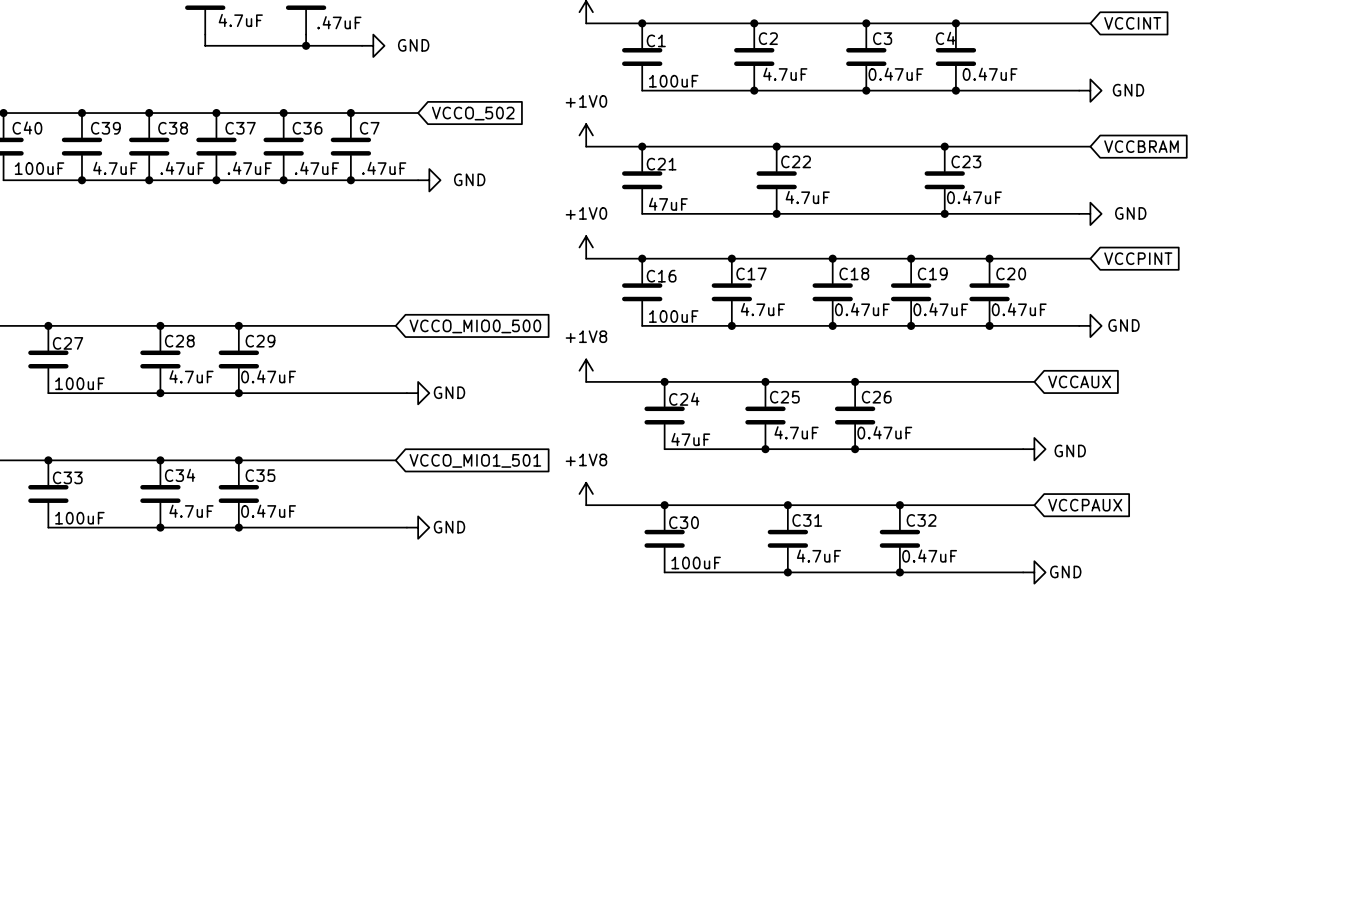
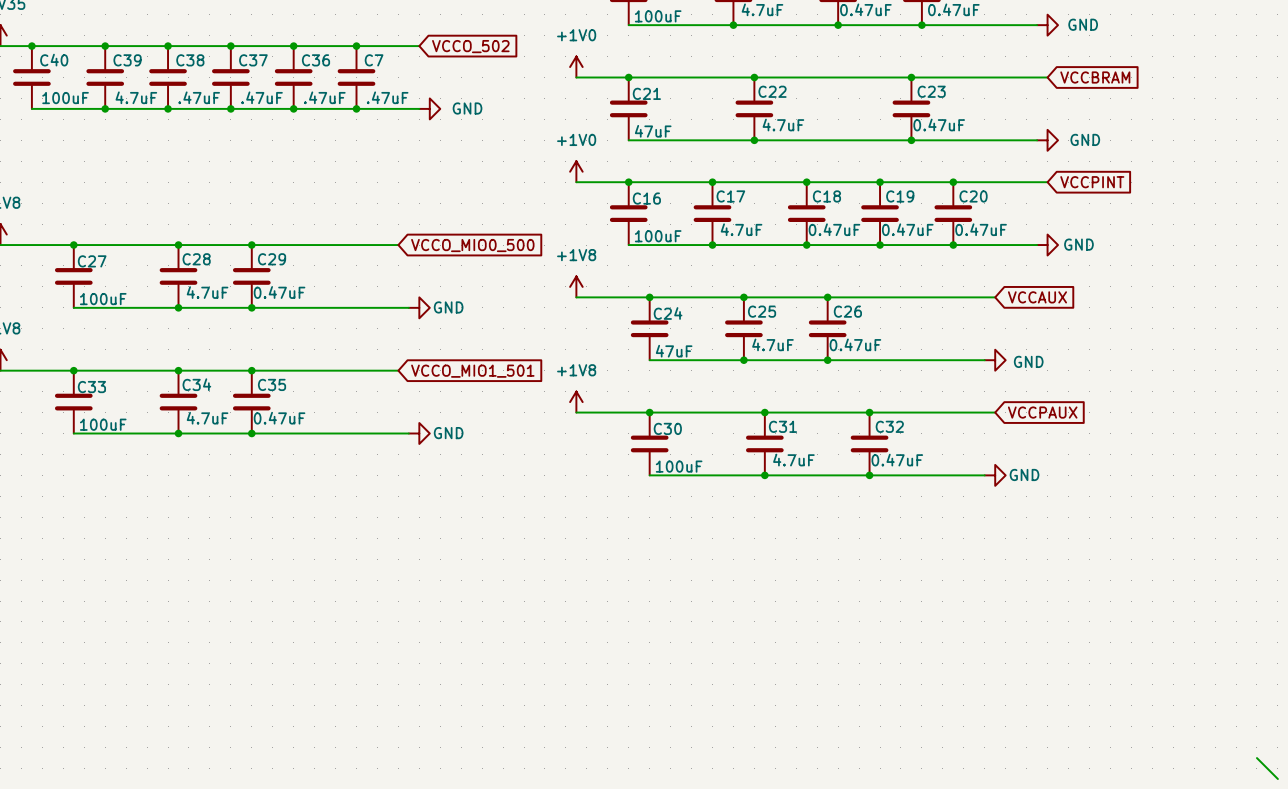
wire: none -> (1256, 758) (1277, 779)

